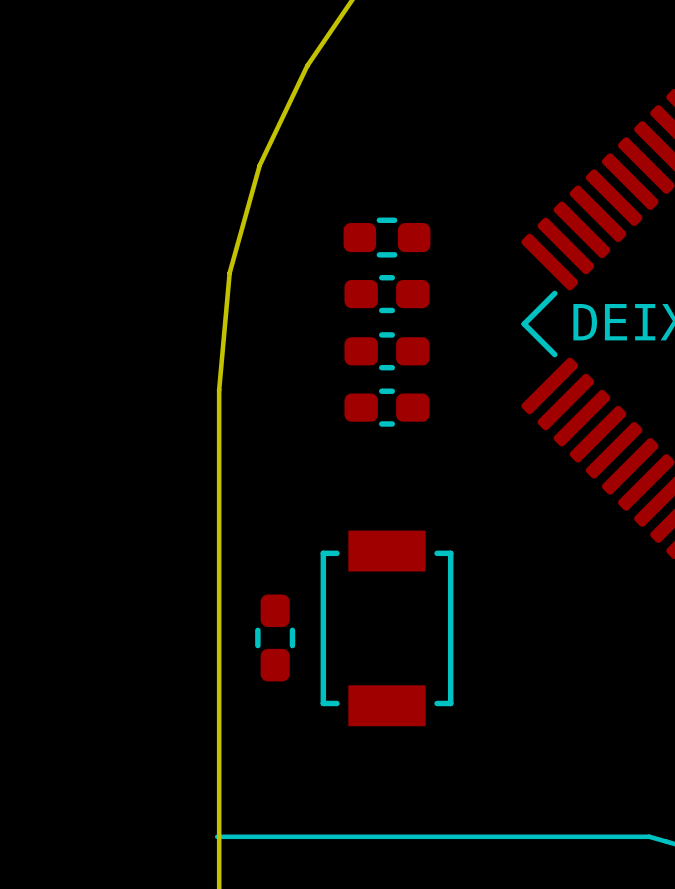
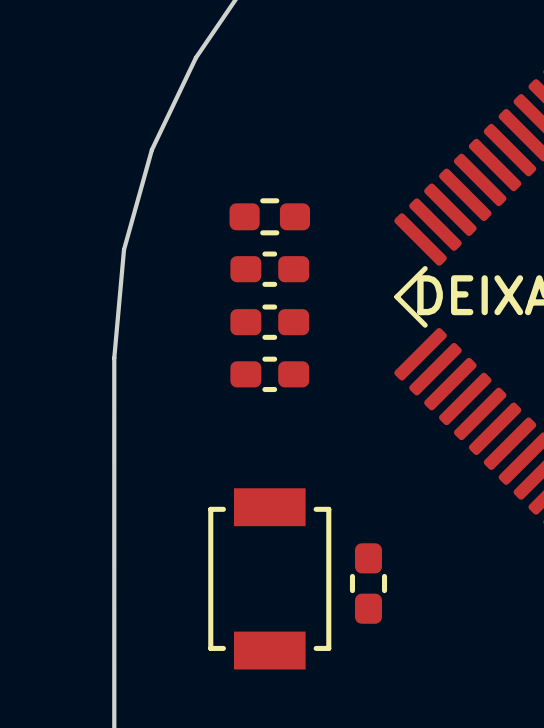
part position: (275, 637) -> (368, 583)

